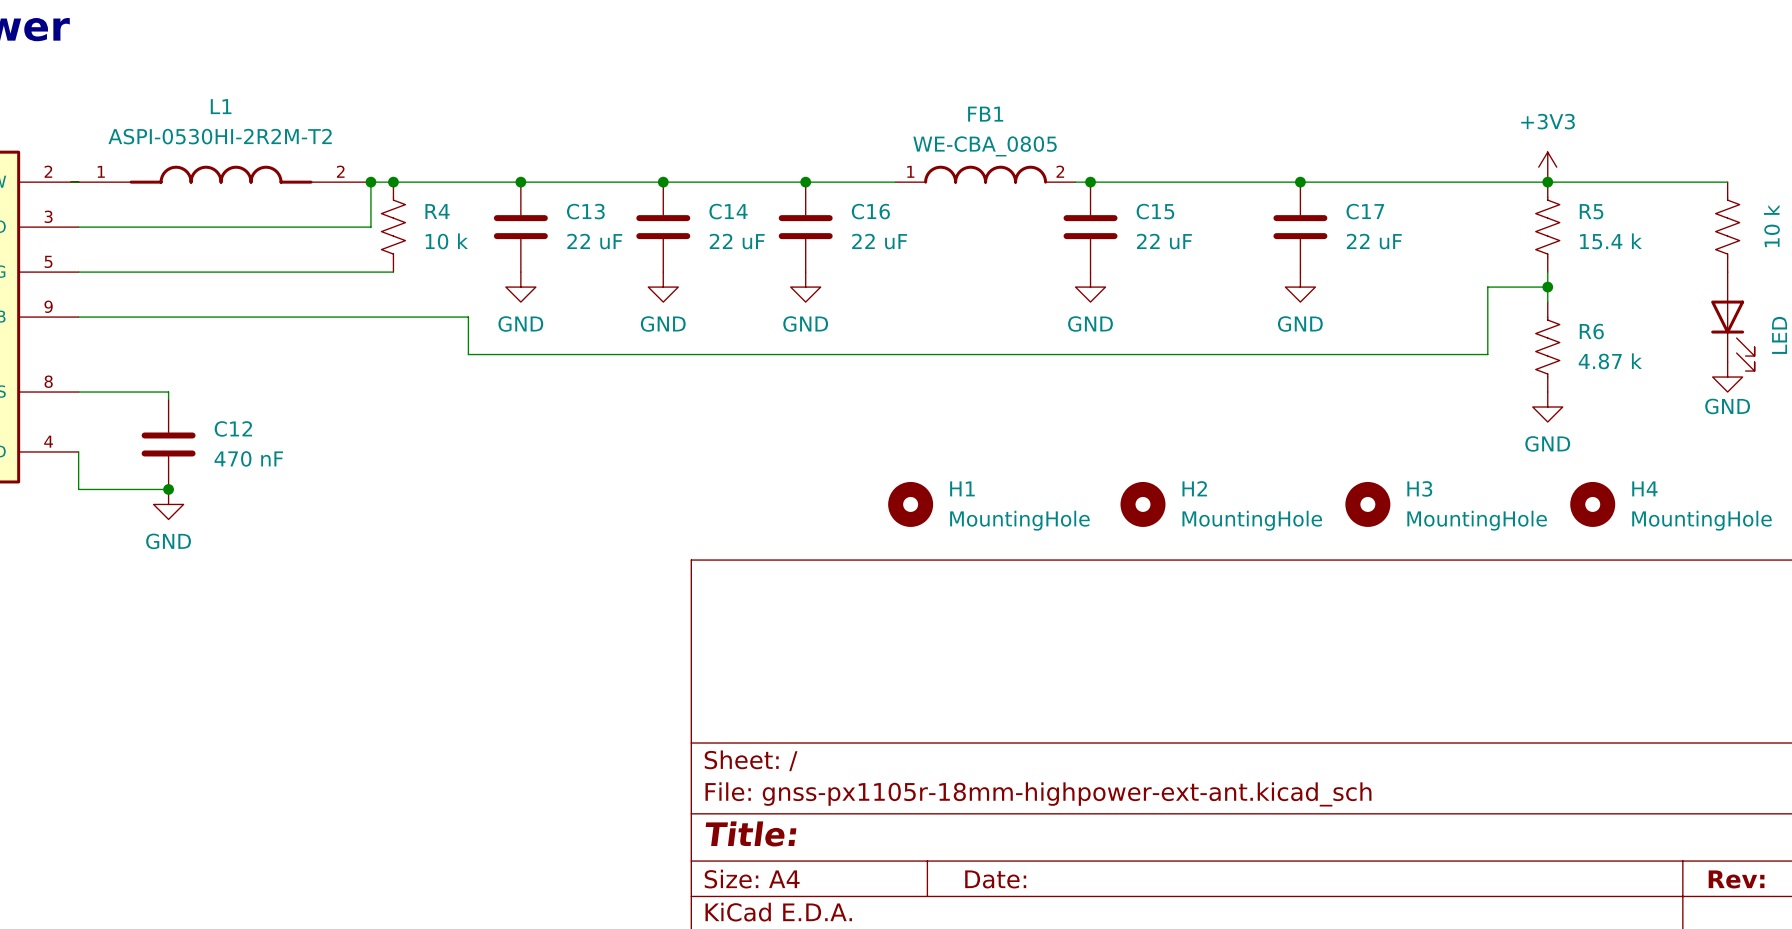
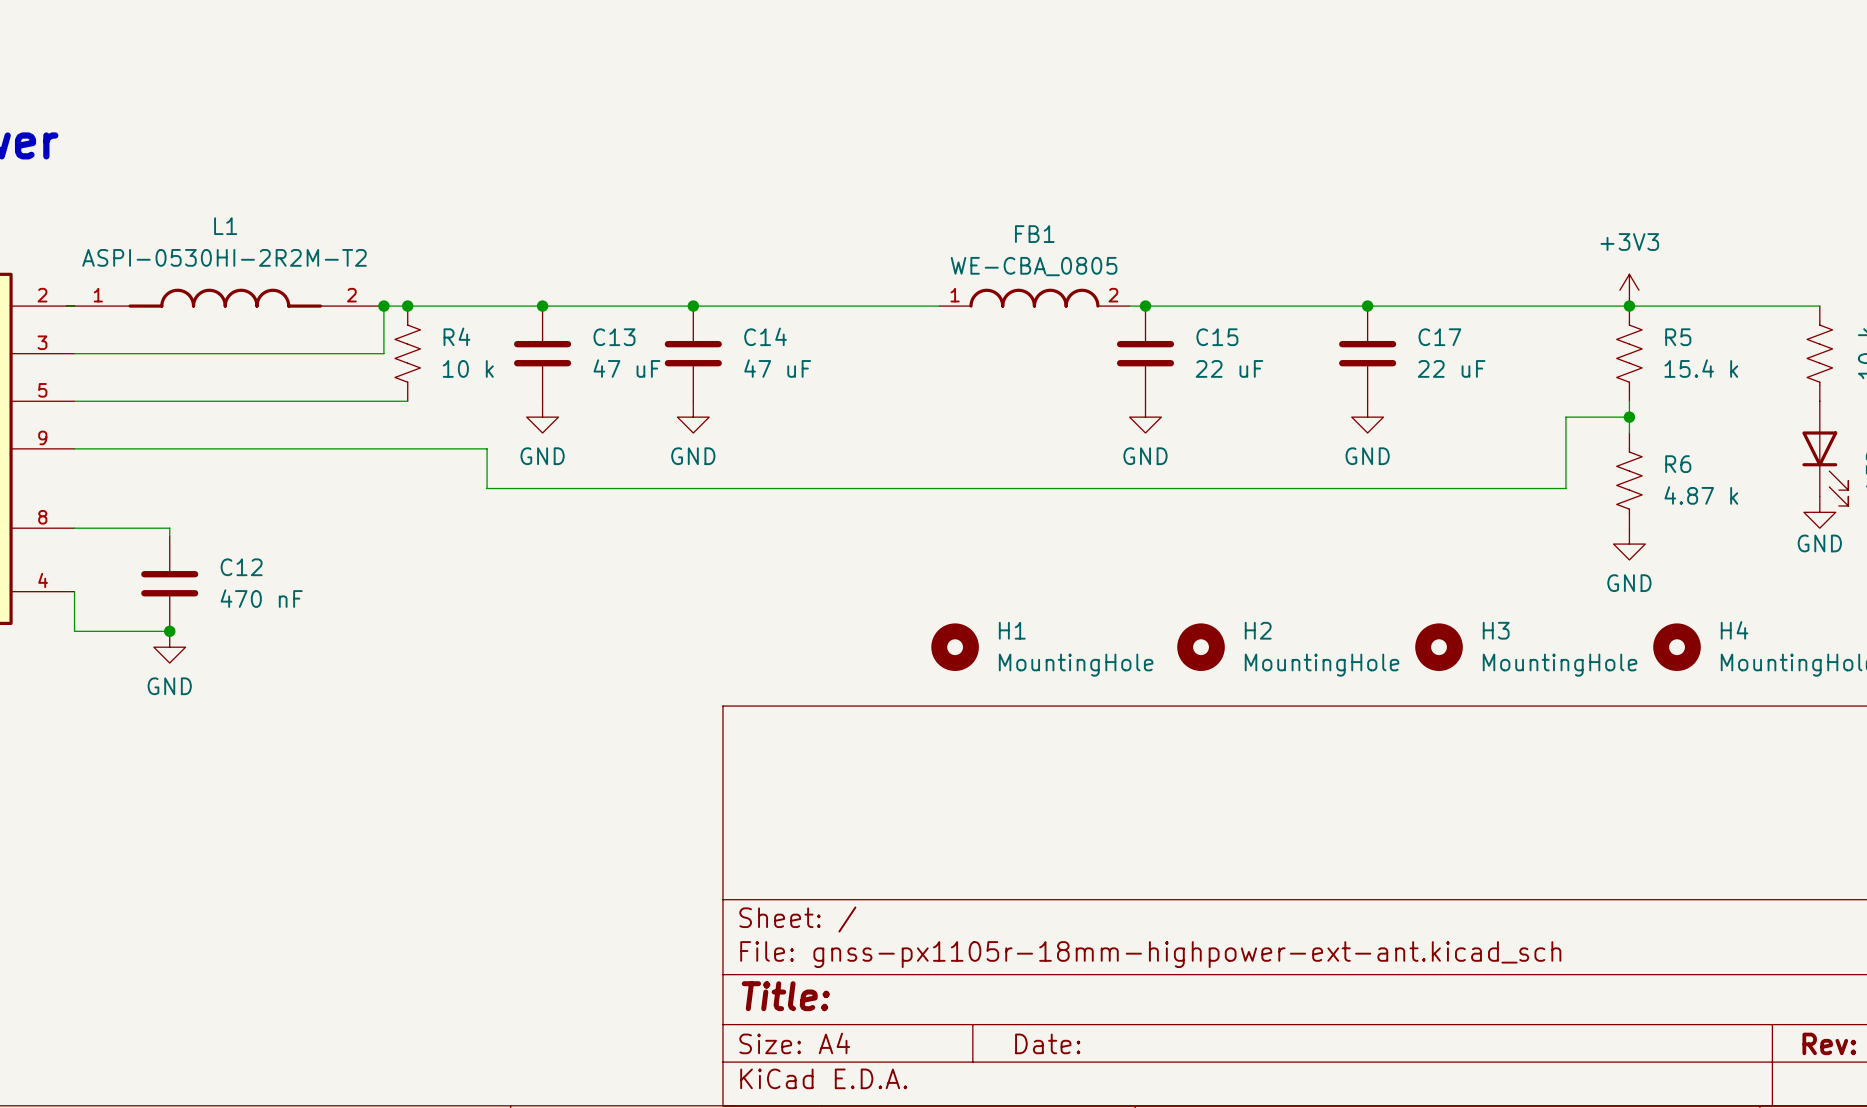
junction: (805, 182) -> none
C16: 22 uF (805, 227) -> none
C13 value: 22 uF (594, 241) -> 47 uF (626, 368)
C14 value: 22 uF (737, 241) -> 47 uF (777, 368)
power symbol: GND (805, 287) -> none

